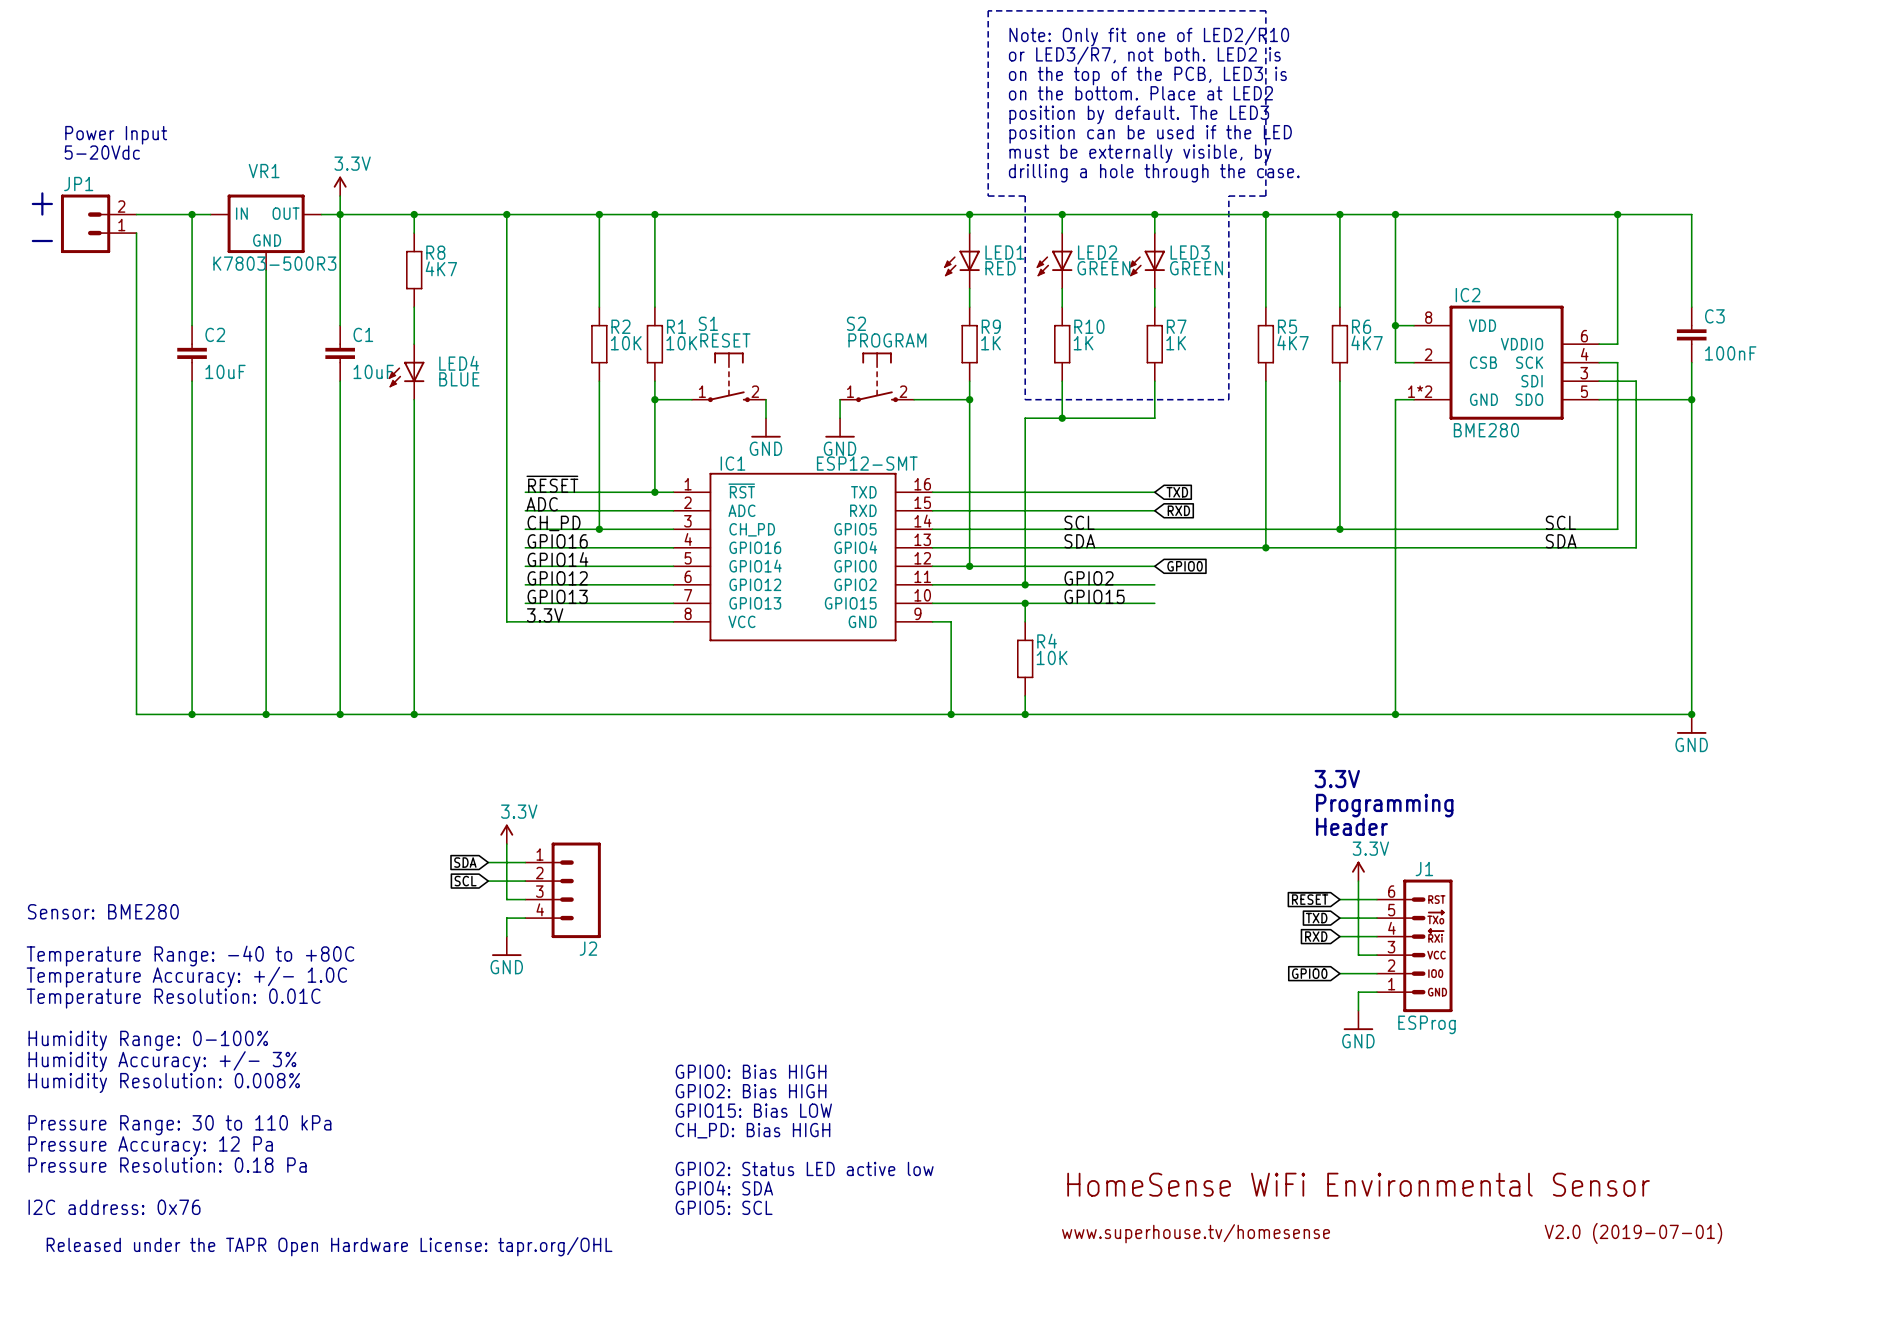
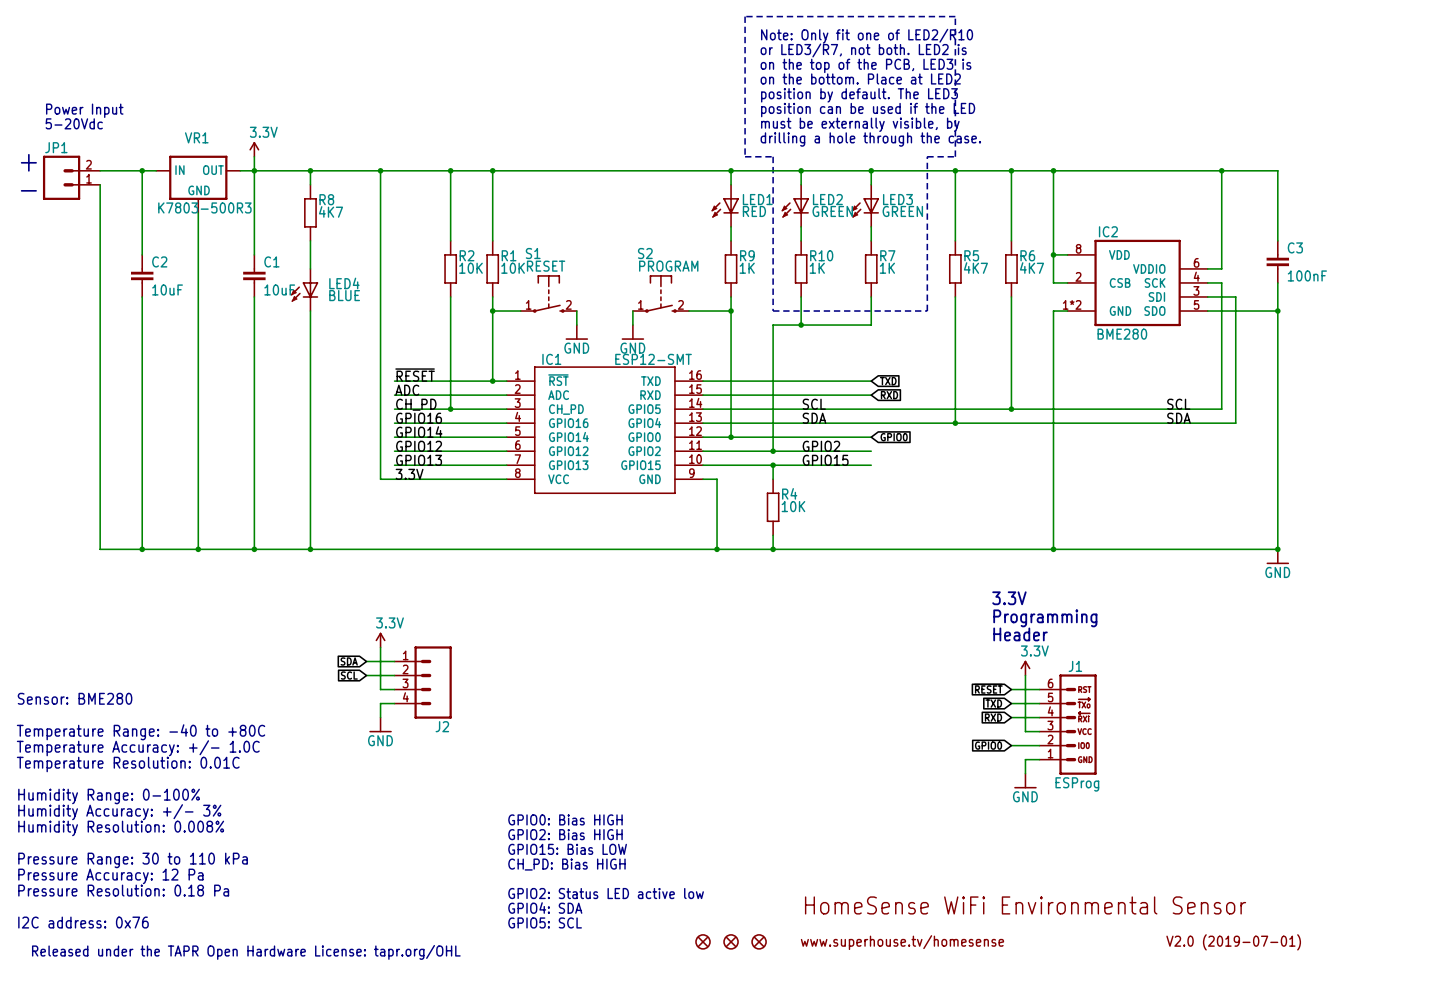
part: none -> (703, 941)
part: none -> (731, 941)
part: none -> (759, 941)

